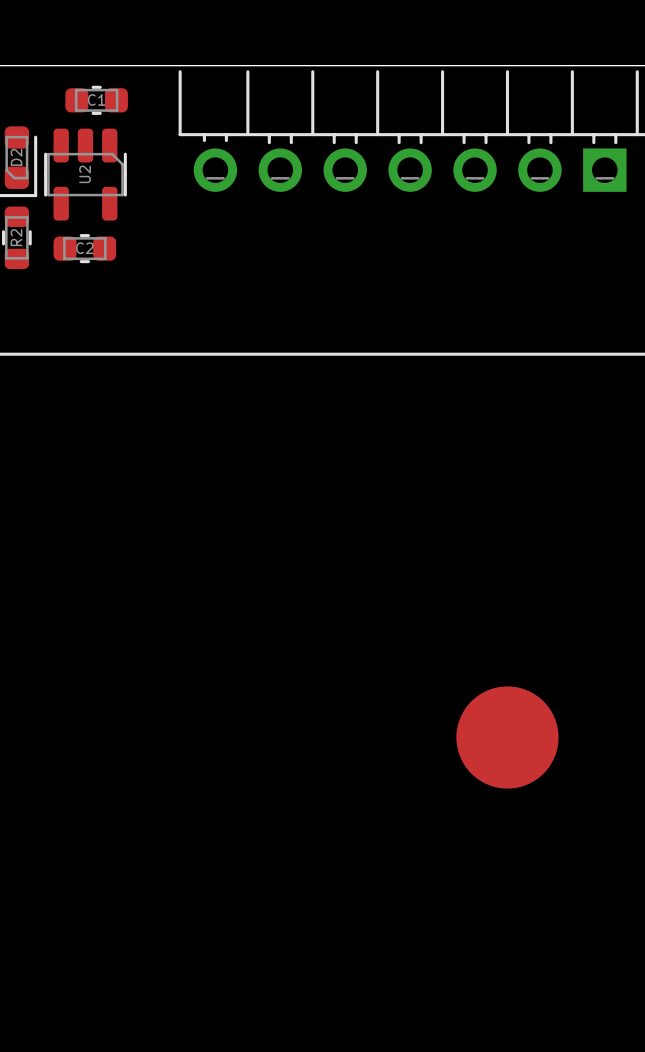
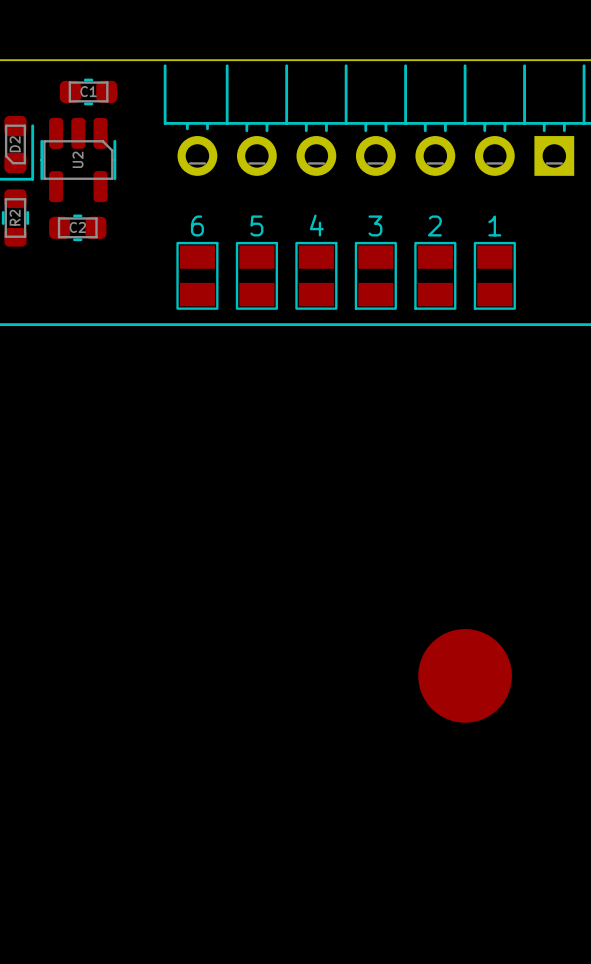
text: none -> 6 (197, 225)
text: none -> 5 (256, 225)
text: none -> 4 (316, 225)
text: none -> 3 (375, 225)
text: none -> 2 (434, 225)
text: none -> 1 (494, 225)
part: none -> (197, 275)
part: none -> (256, 275)
part: none -> (316, 275)
part: none -> (375, 275)
part: none -> (435, 275)
part: none -> (494, 275)

